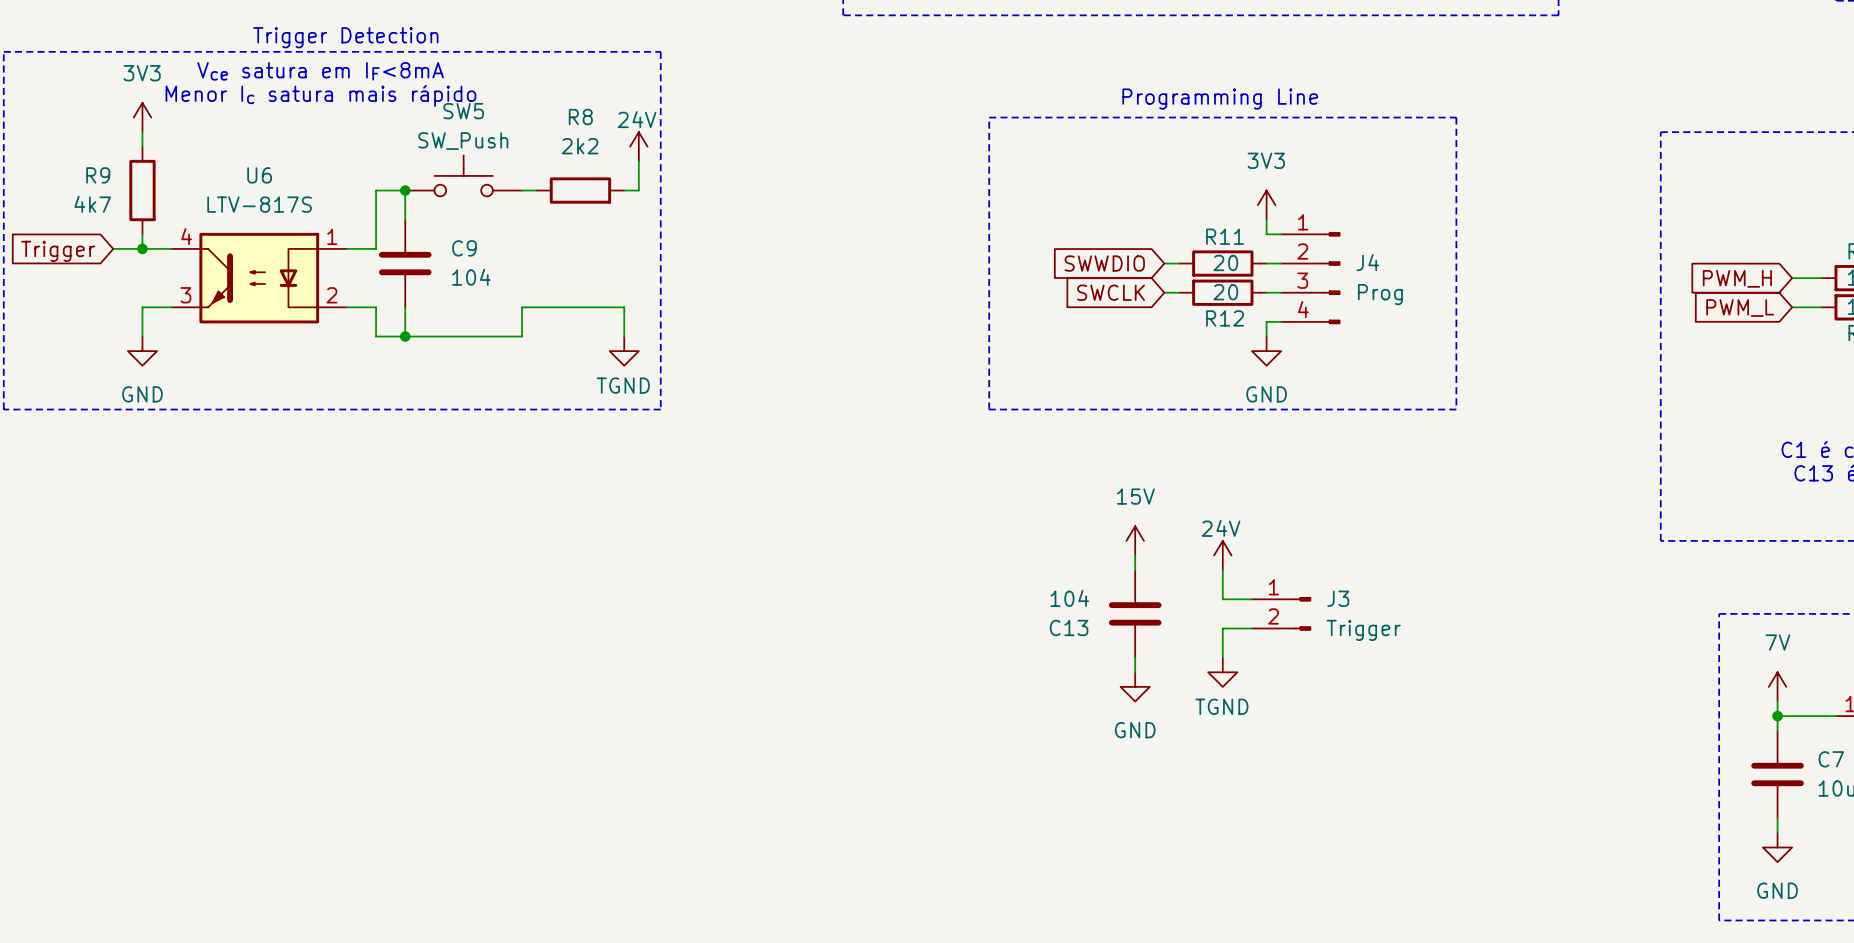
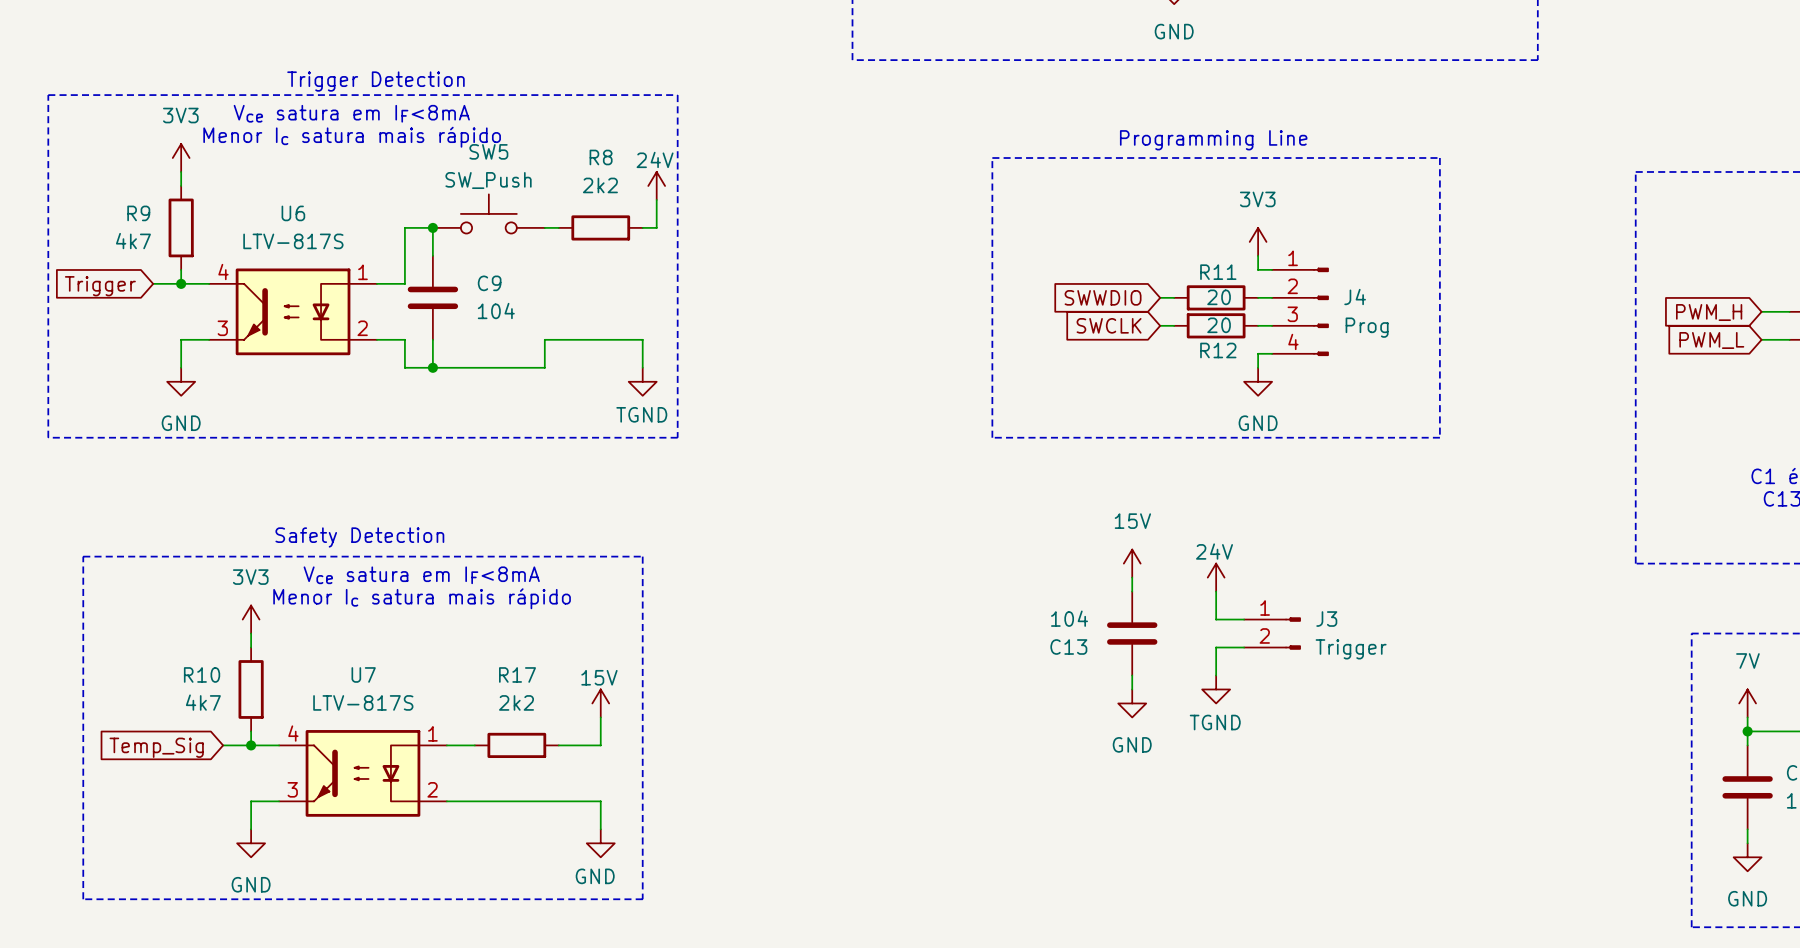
text: none -> Safety Detection (359, 537)
line: none -> (83, 556) (642, 556) (642, 899) (83, 899) (83, 556)
text: none -> Vce satura em IF<8mA (421, 575)
text: none -> Menor Ic satura mais rápido (422, 598)
power symbol: none -> 3V3 (251, 619)
wire: none -> (251, 633) (251, 647)
R10: none -> 4k7 (251, 689)
power symbol: none -> 15V (600, 703)
wire: none -> (600, 717) (600, 745) (558, 745)
wire: none -> (251, 731) (251, 745)
wire: none -> (223, 745) (279, 745)
junction: none -> (251, 745)
wire: none -> (446, 745) (474, 745)
R17: none -> 2k2 (516, 745)
global label: none -> Temp_Sig (156, 747)
U7: none -> LTV-817S (362, 773)
wire: none -> (279, 801) (251, 801) (251, 829)
wire: none -> (446, 801) (600, 801) (600, 829)
power symbol: none -> GND (251, 843)
power symbol: none -> GND (600, 843)

